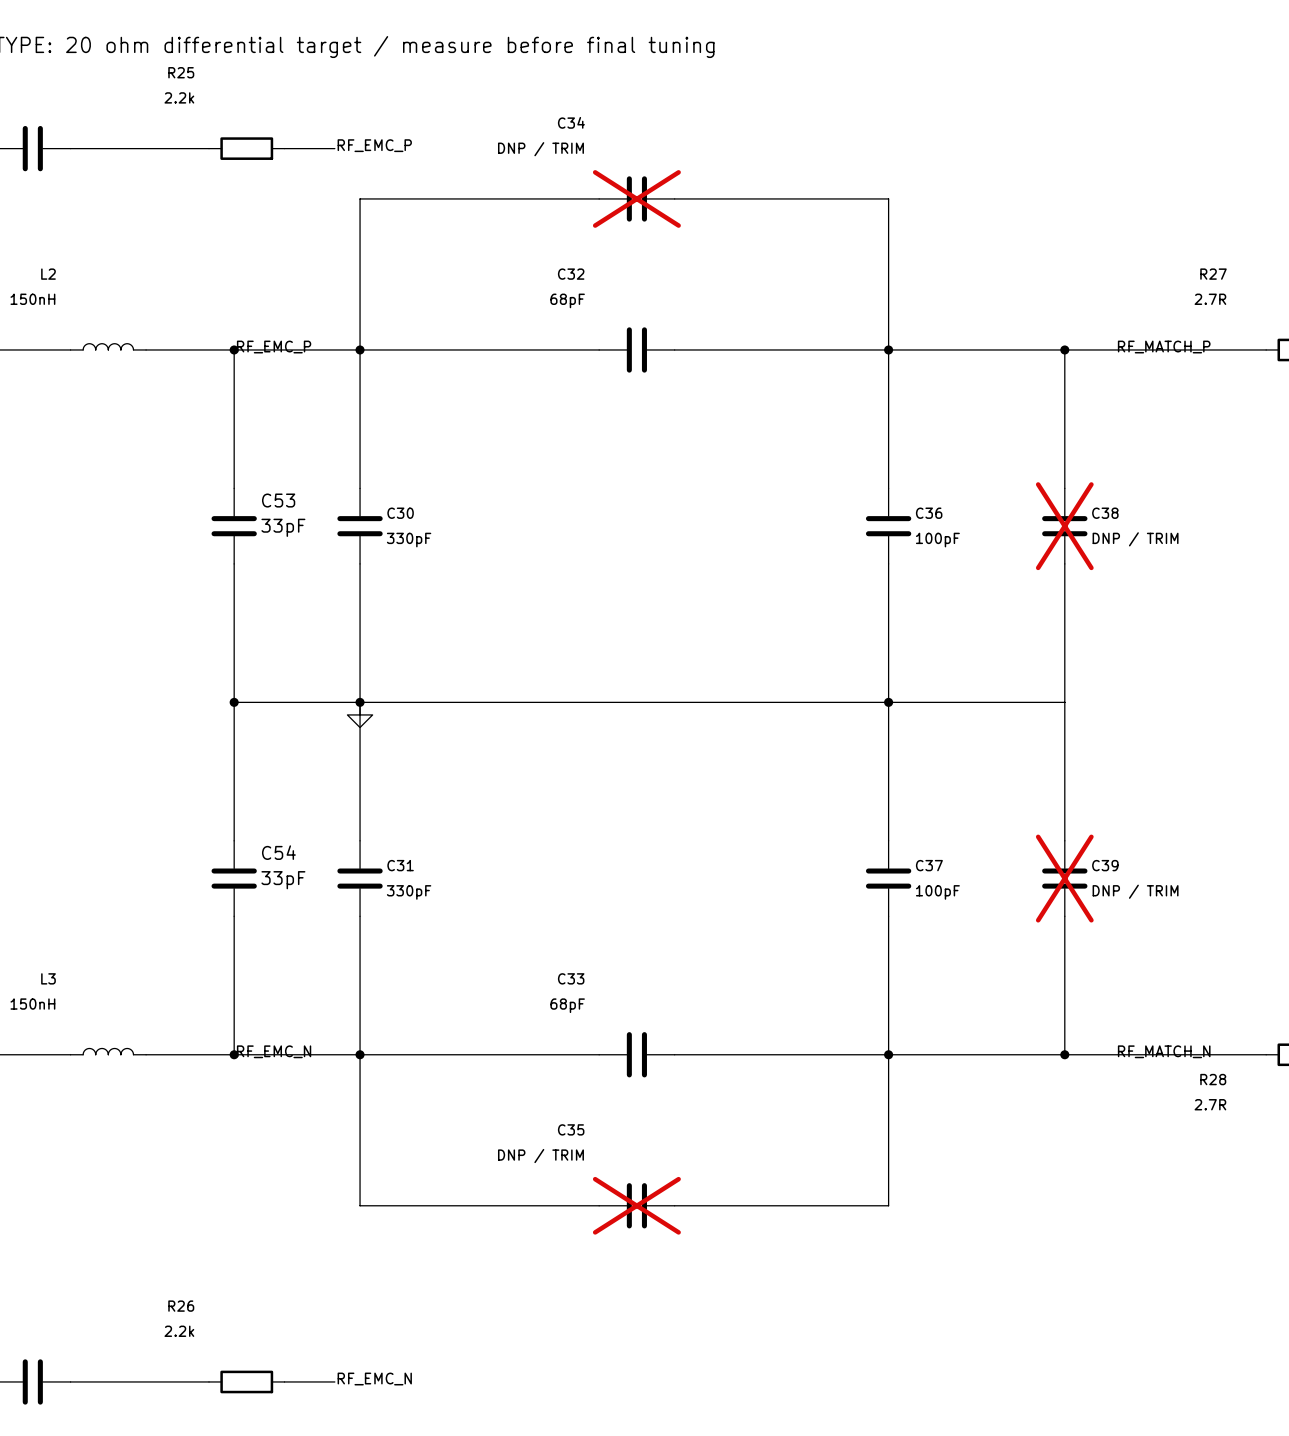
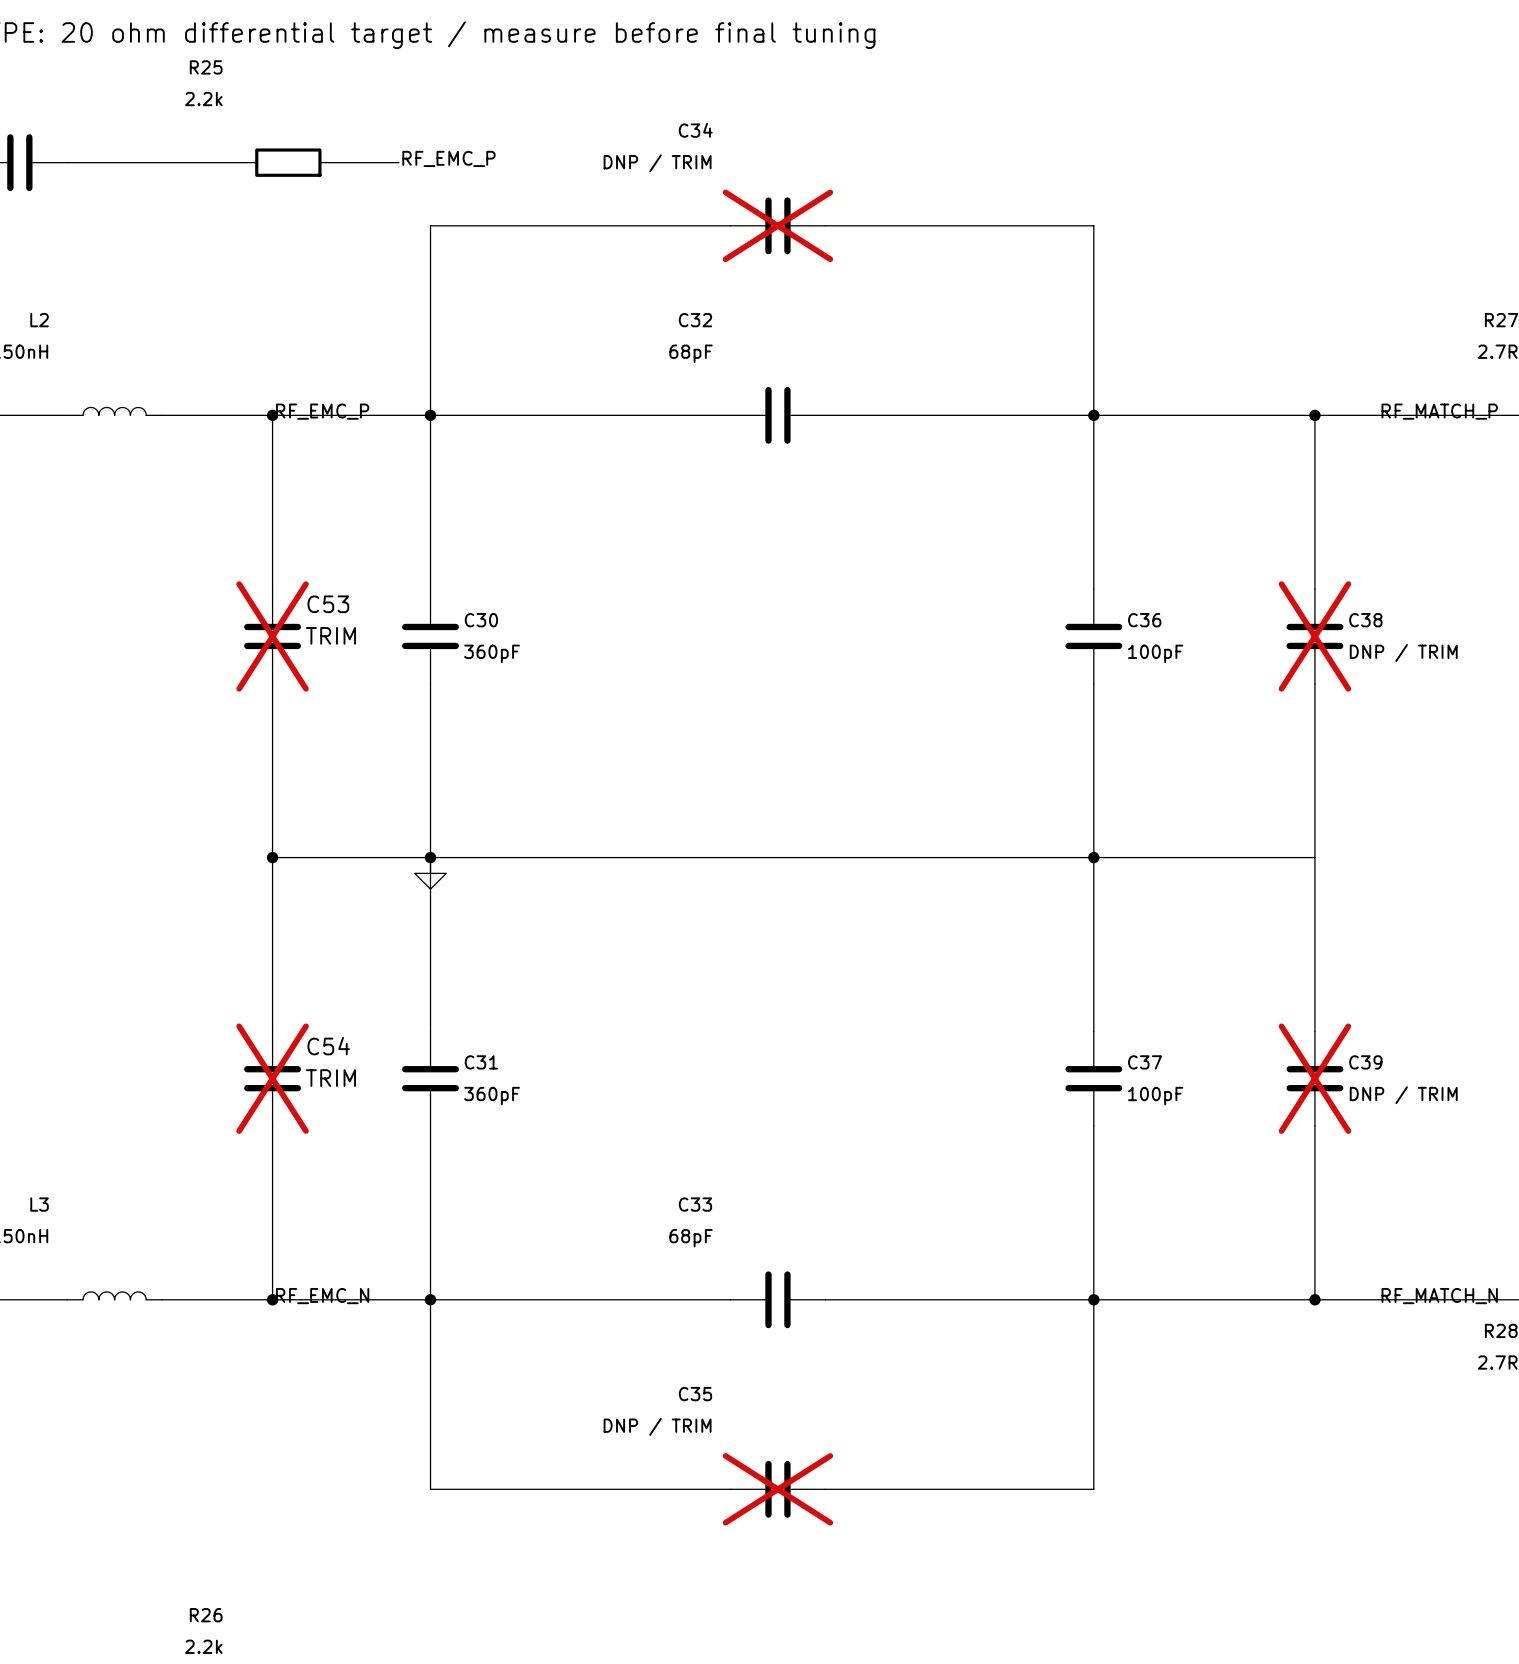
C53 do-not-place cross: none -> (272, 636)
C53 value: 33pF (283, 527) -> TRIM (330, 635)
C30 value: 330pF (409, 540) -> 360pF (492, 653)
C54 do-not-place cross: none -> (272, 1078)
C54 value: 33pF (283, 880) -> TRIM (330, 1078)
C31 value: 330pF (409, 892) -> 360pF (492, 1096)

